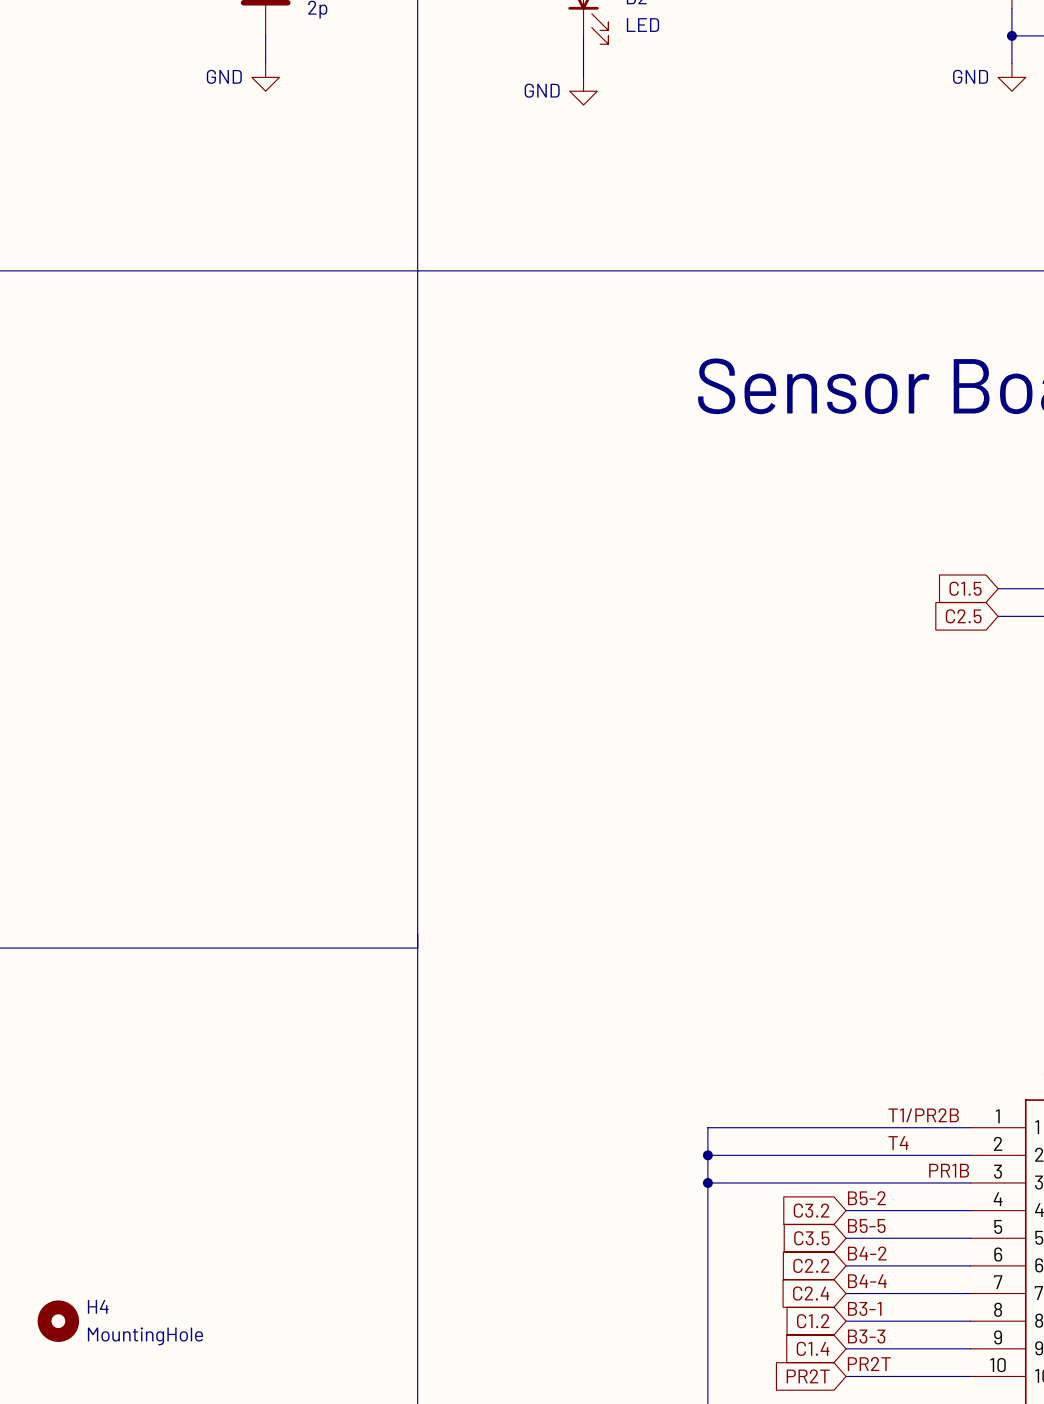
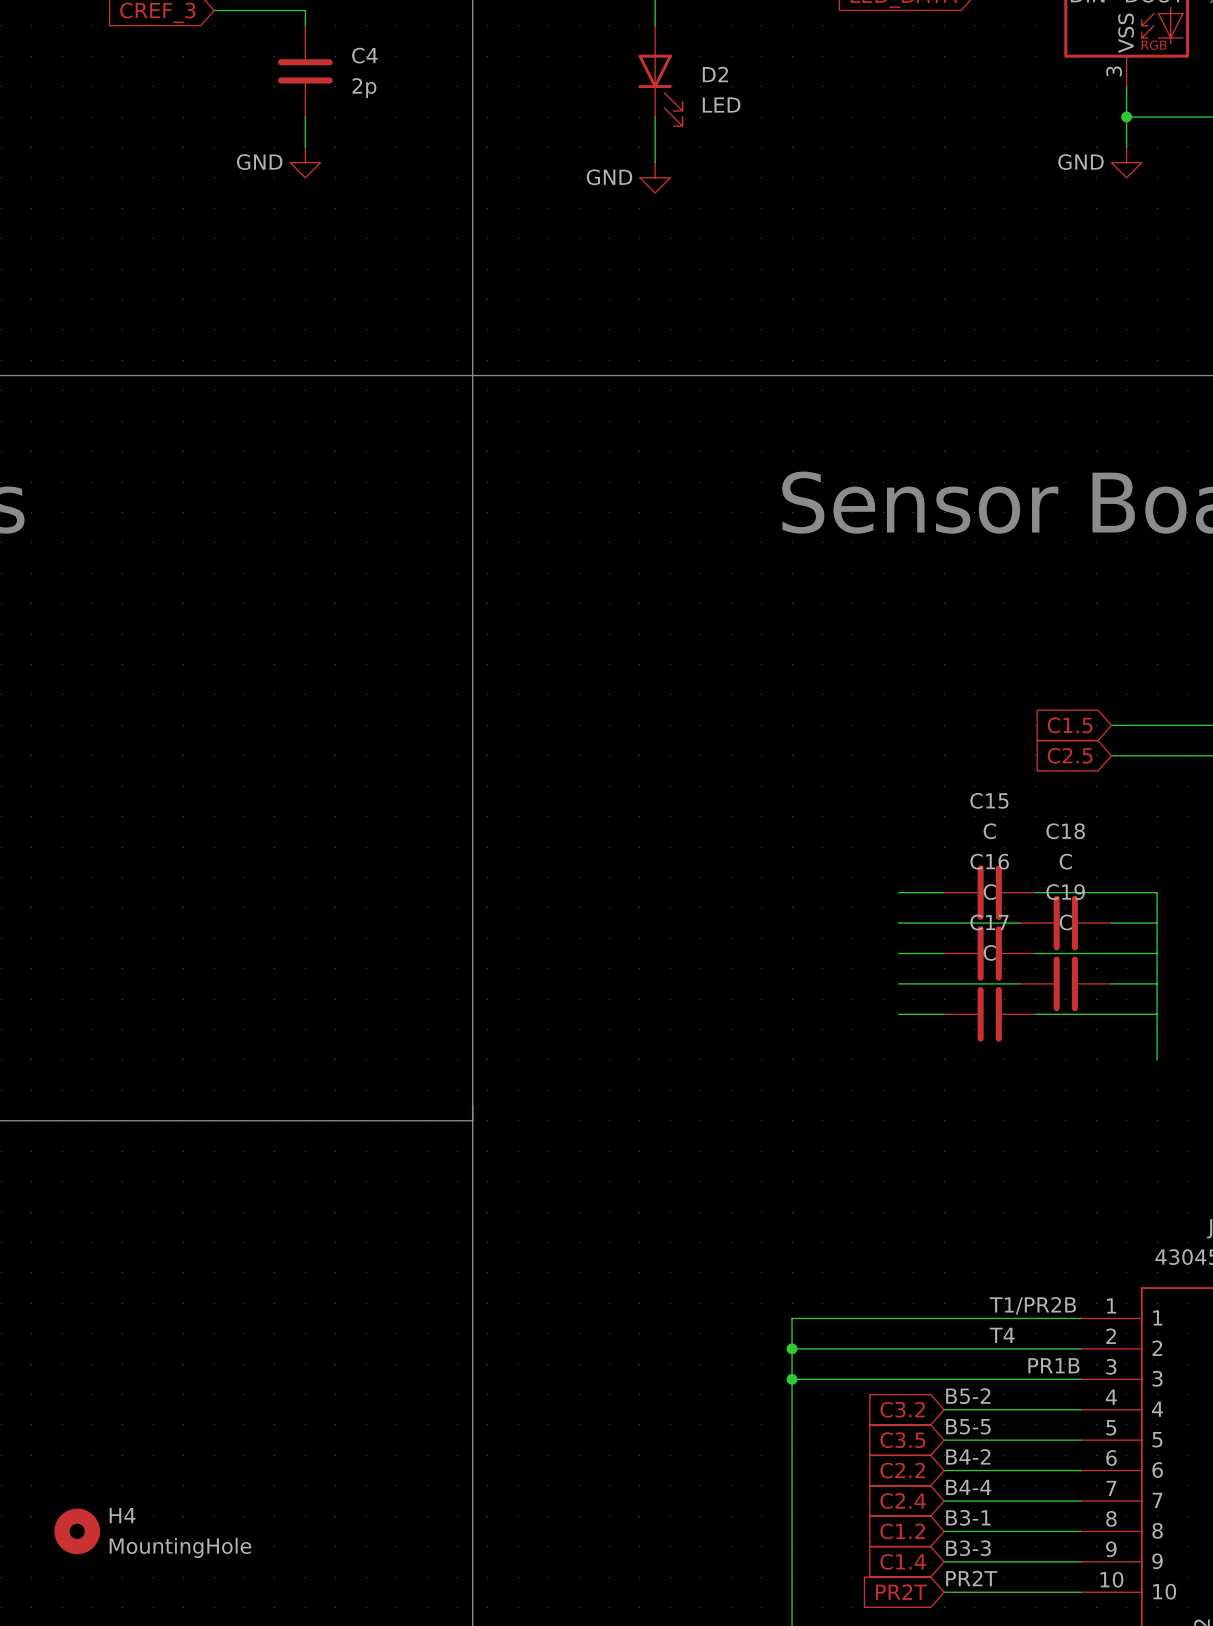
wire: none -> (898, 892) (944, 892)
C15: none -> C (989, 892)
wire: none -> (1035, 892) (1157, 892) (1157, 1059)
wire: none -> (898, 923) (1020, 923)
C18: none -> C (1065, 923)
wire: none -> (1111, 923) (1157, 923)
wire: none -> (898, 953) (944, 953)
C16: none -> C (989, 953)
wire: none -> (1035, 953) (1157, 953)
wire: none -> (898, 983) (1020, 983)
C19: none -> C (1065, 983)
wire: none -> (1111, 983) (1157, 983)
wire: none -> (898, 1014) (944, 1014)
C17: none -> C (989, 1014)
wire: none -> (1035, 1014) (1157, 1014)

